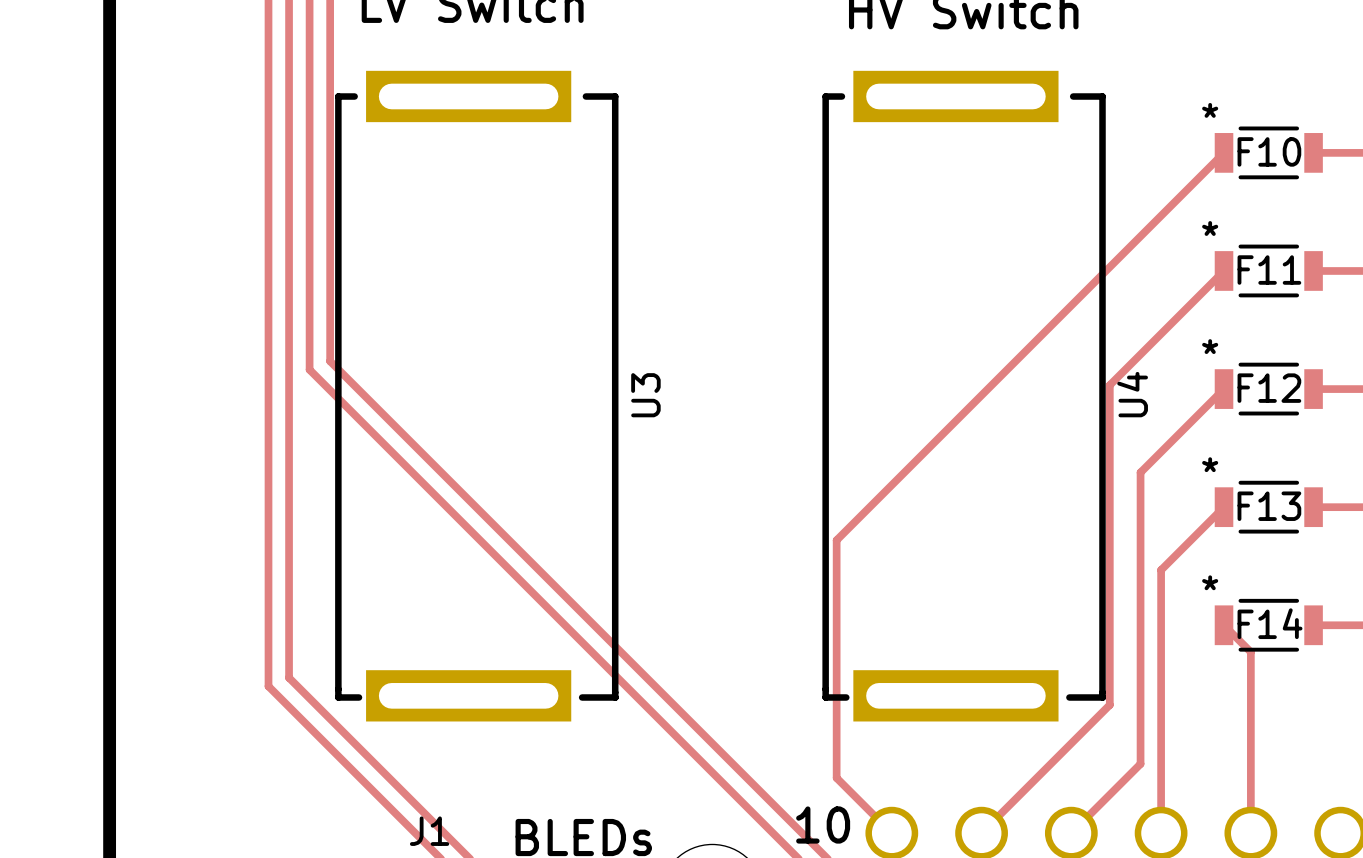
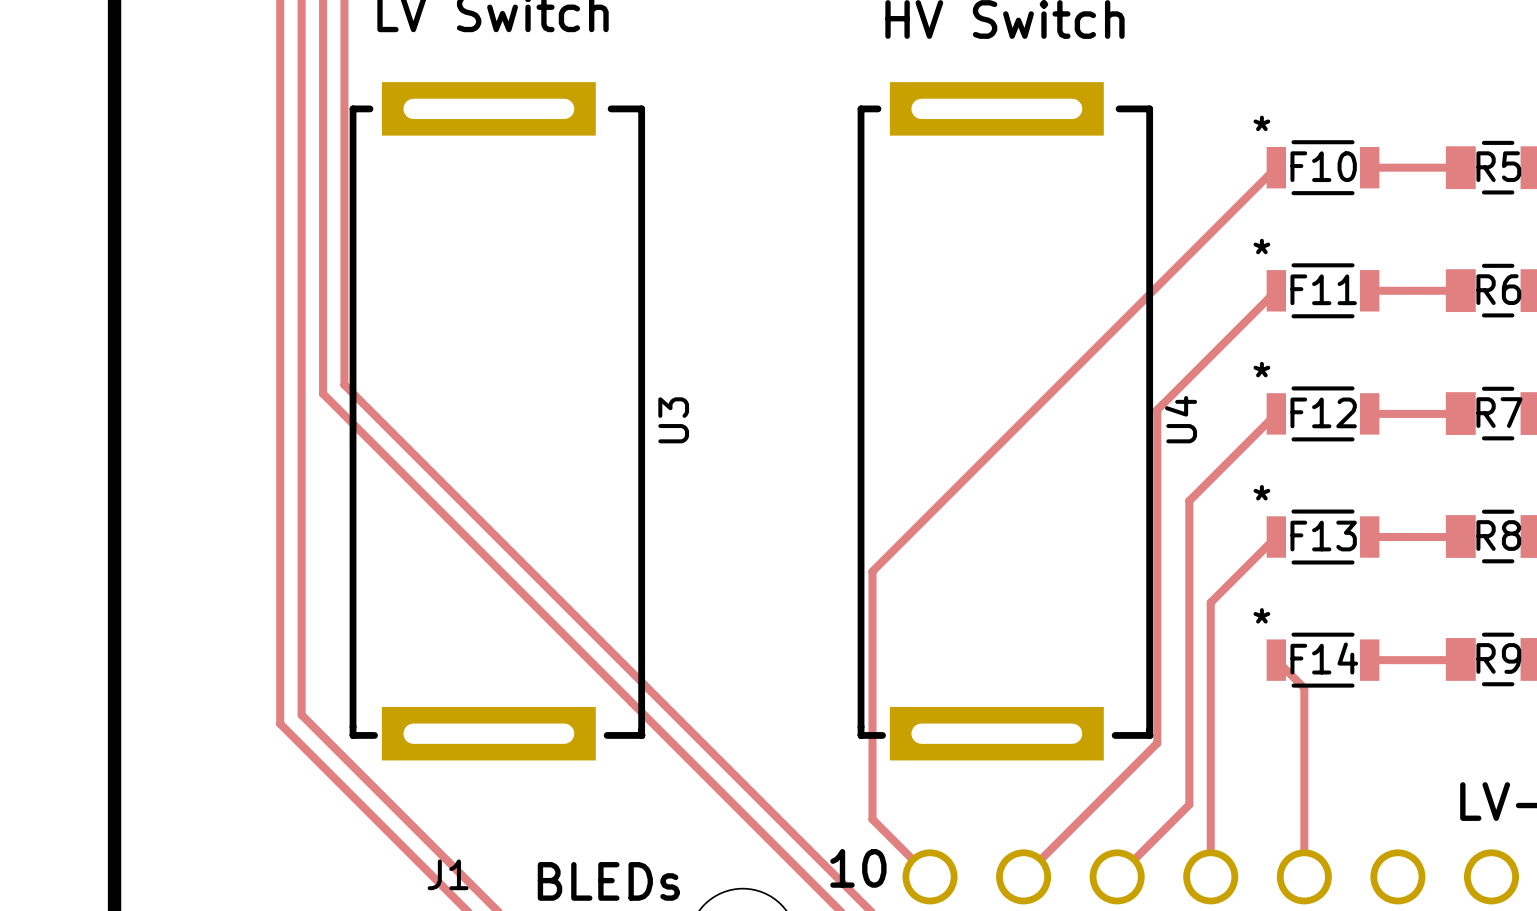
U3 footprint: [335, 70, 619, 722] -> [349, 82, 646, 761]
U4 footprint: [822, 70, 1107, 722] -> [857, 82, 1154, 761]

